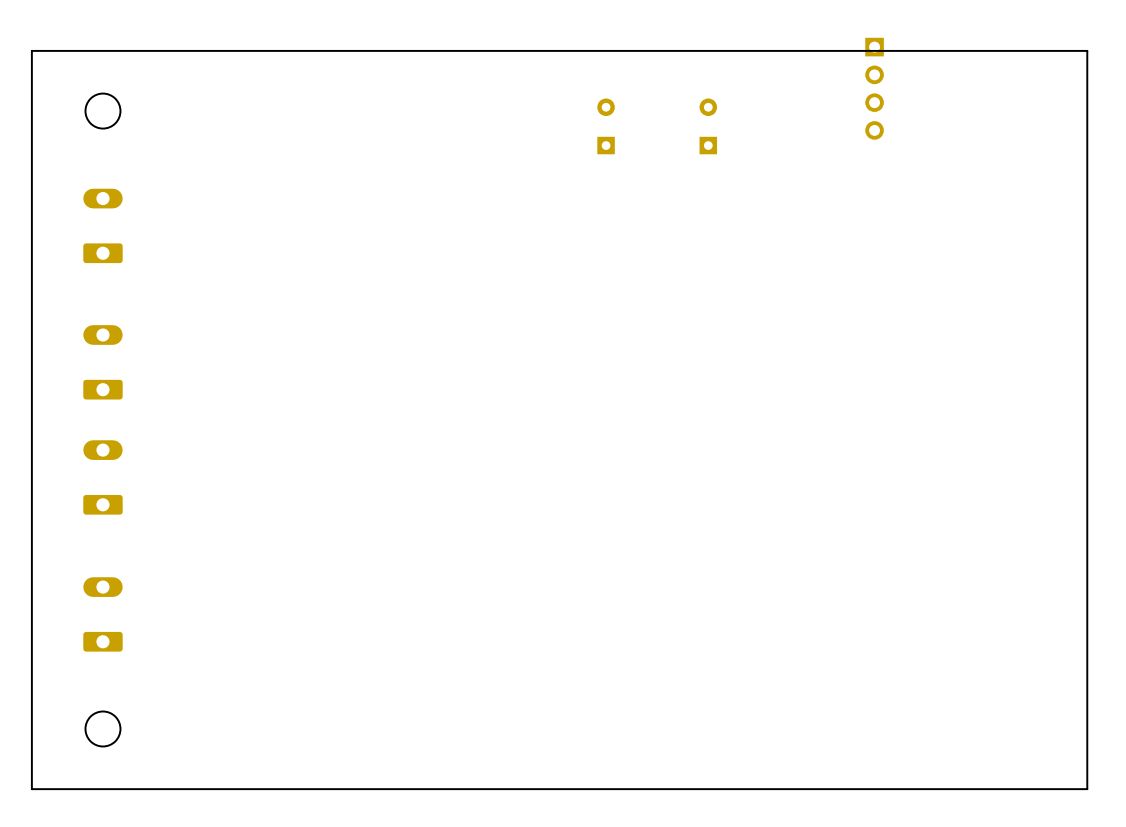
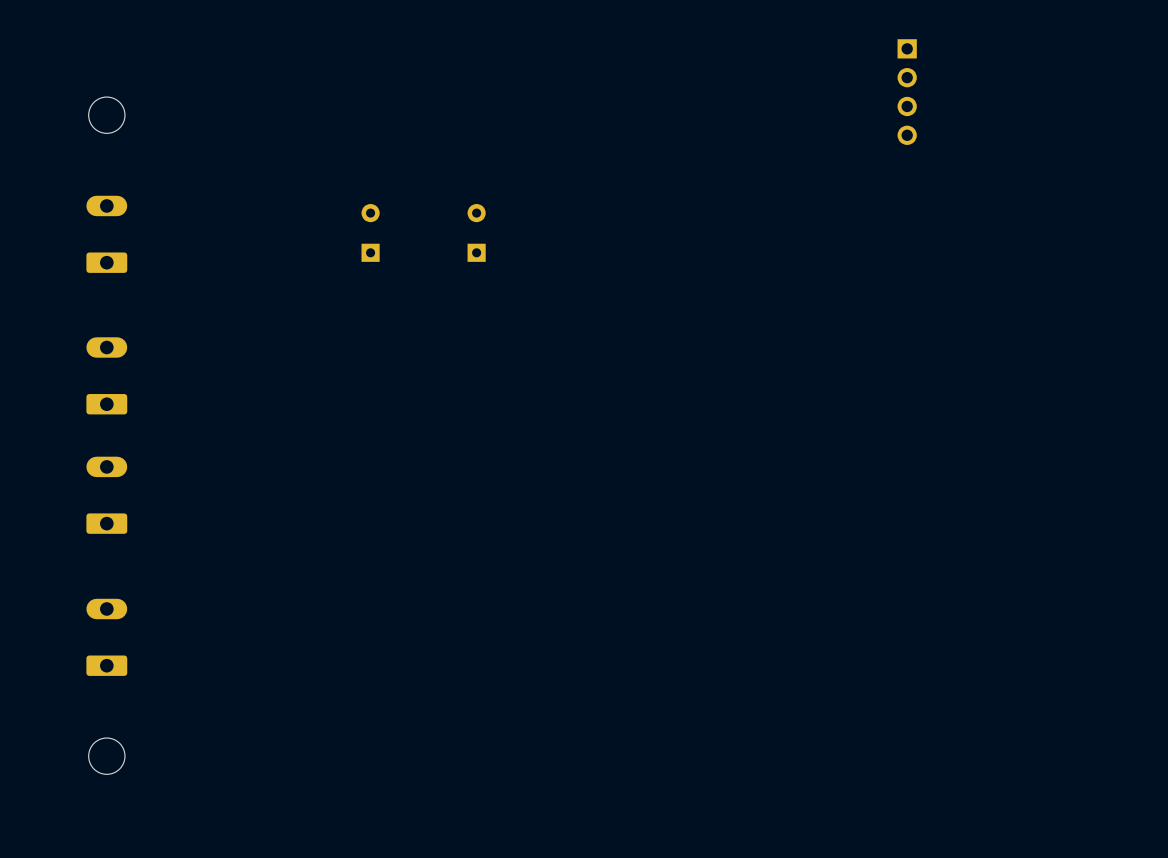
board edge: (1087, 50) (1087, 789) (31, 789) (31, 50) (1087, 50) -> none
part: (606, 126) -> none
part: (708, 126) -> none
part: none -> (370, 232)
part: none -> (476, 232)

